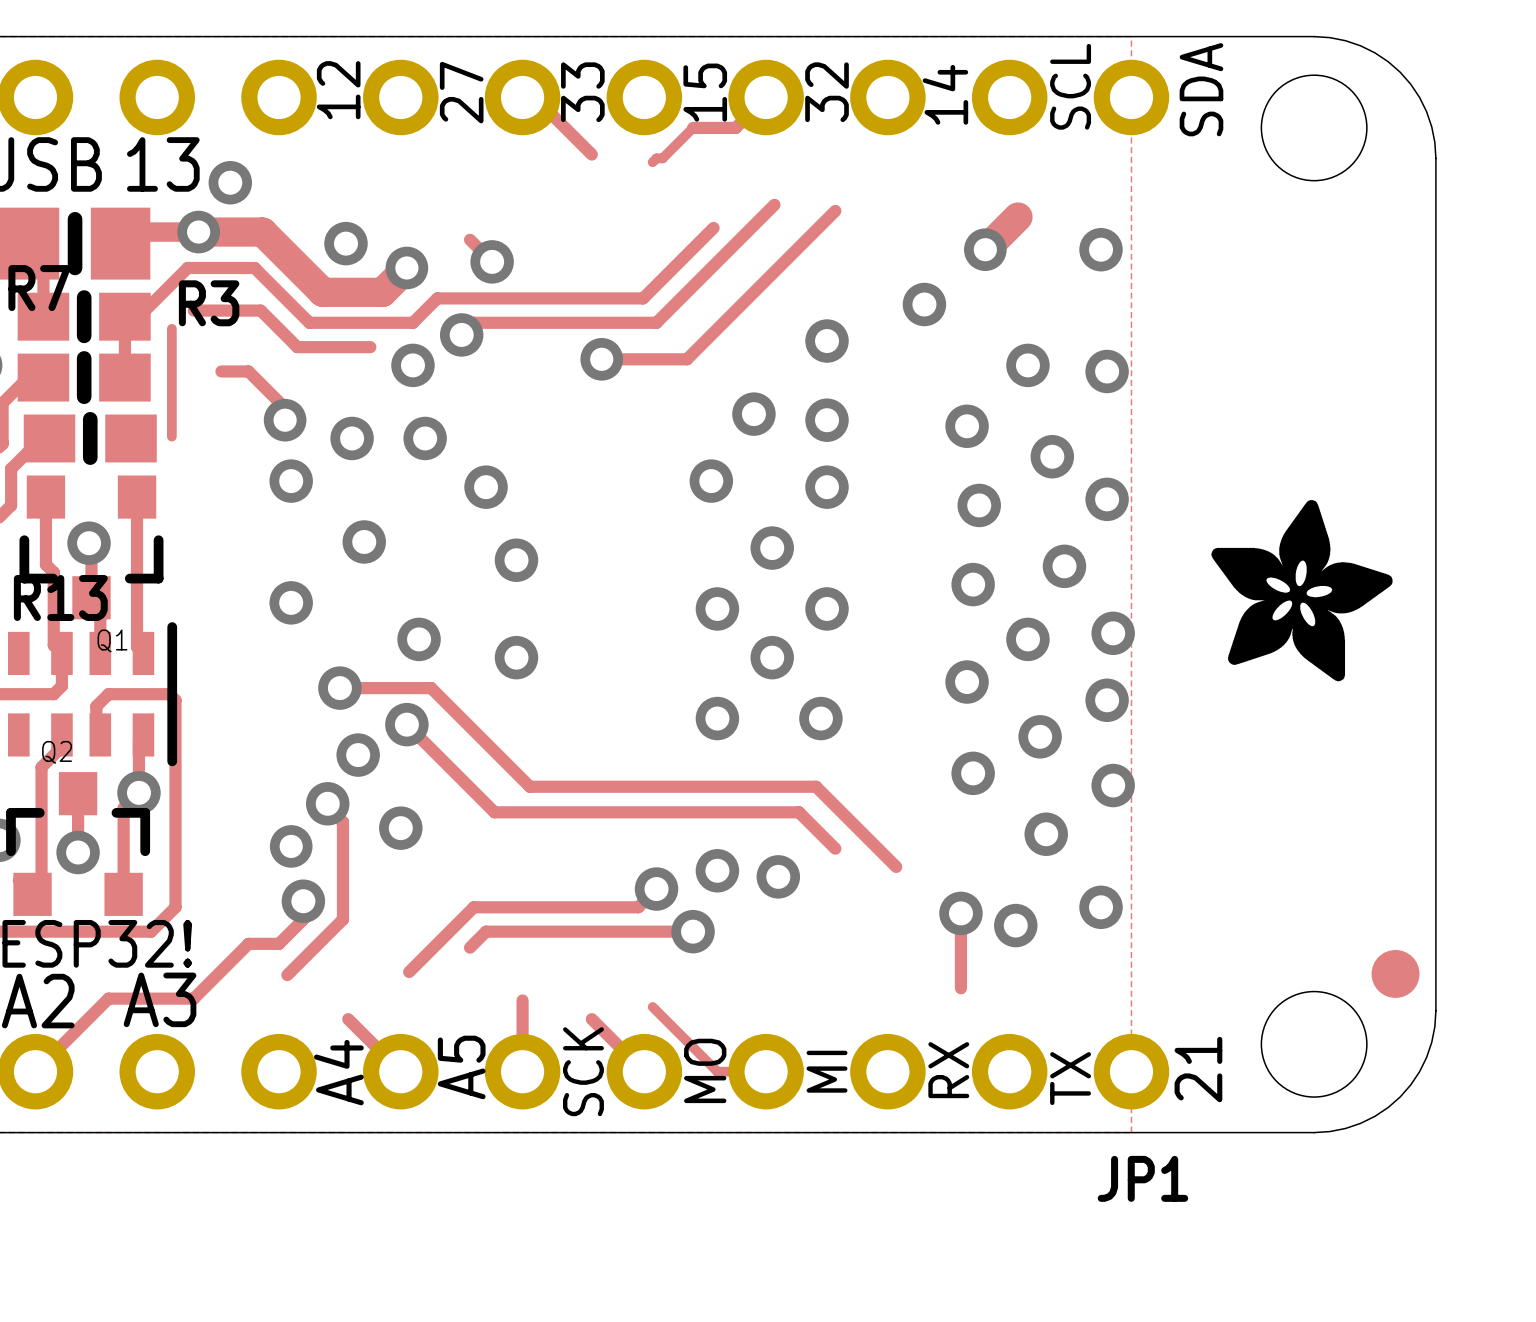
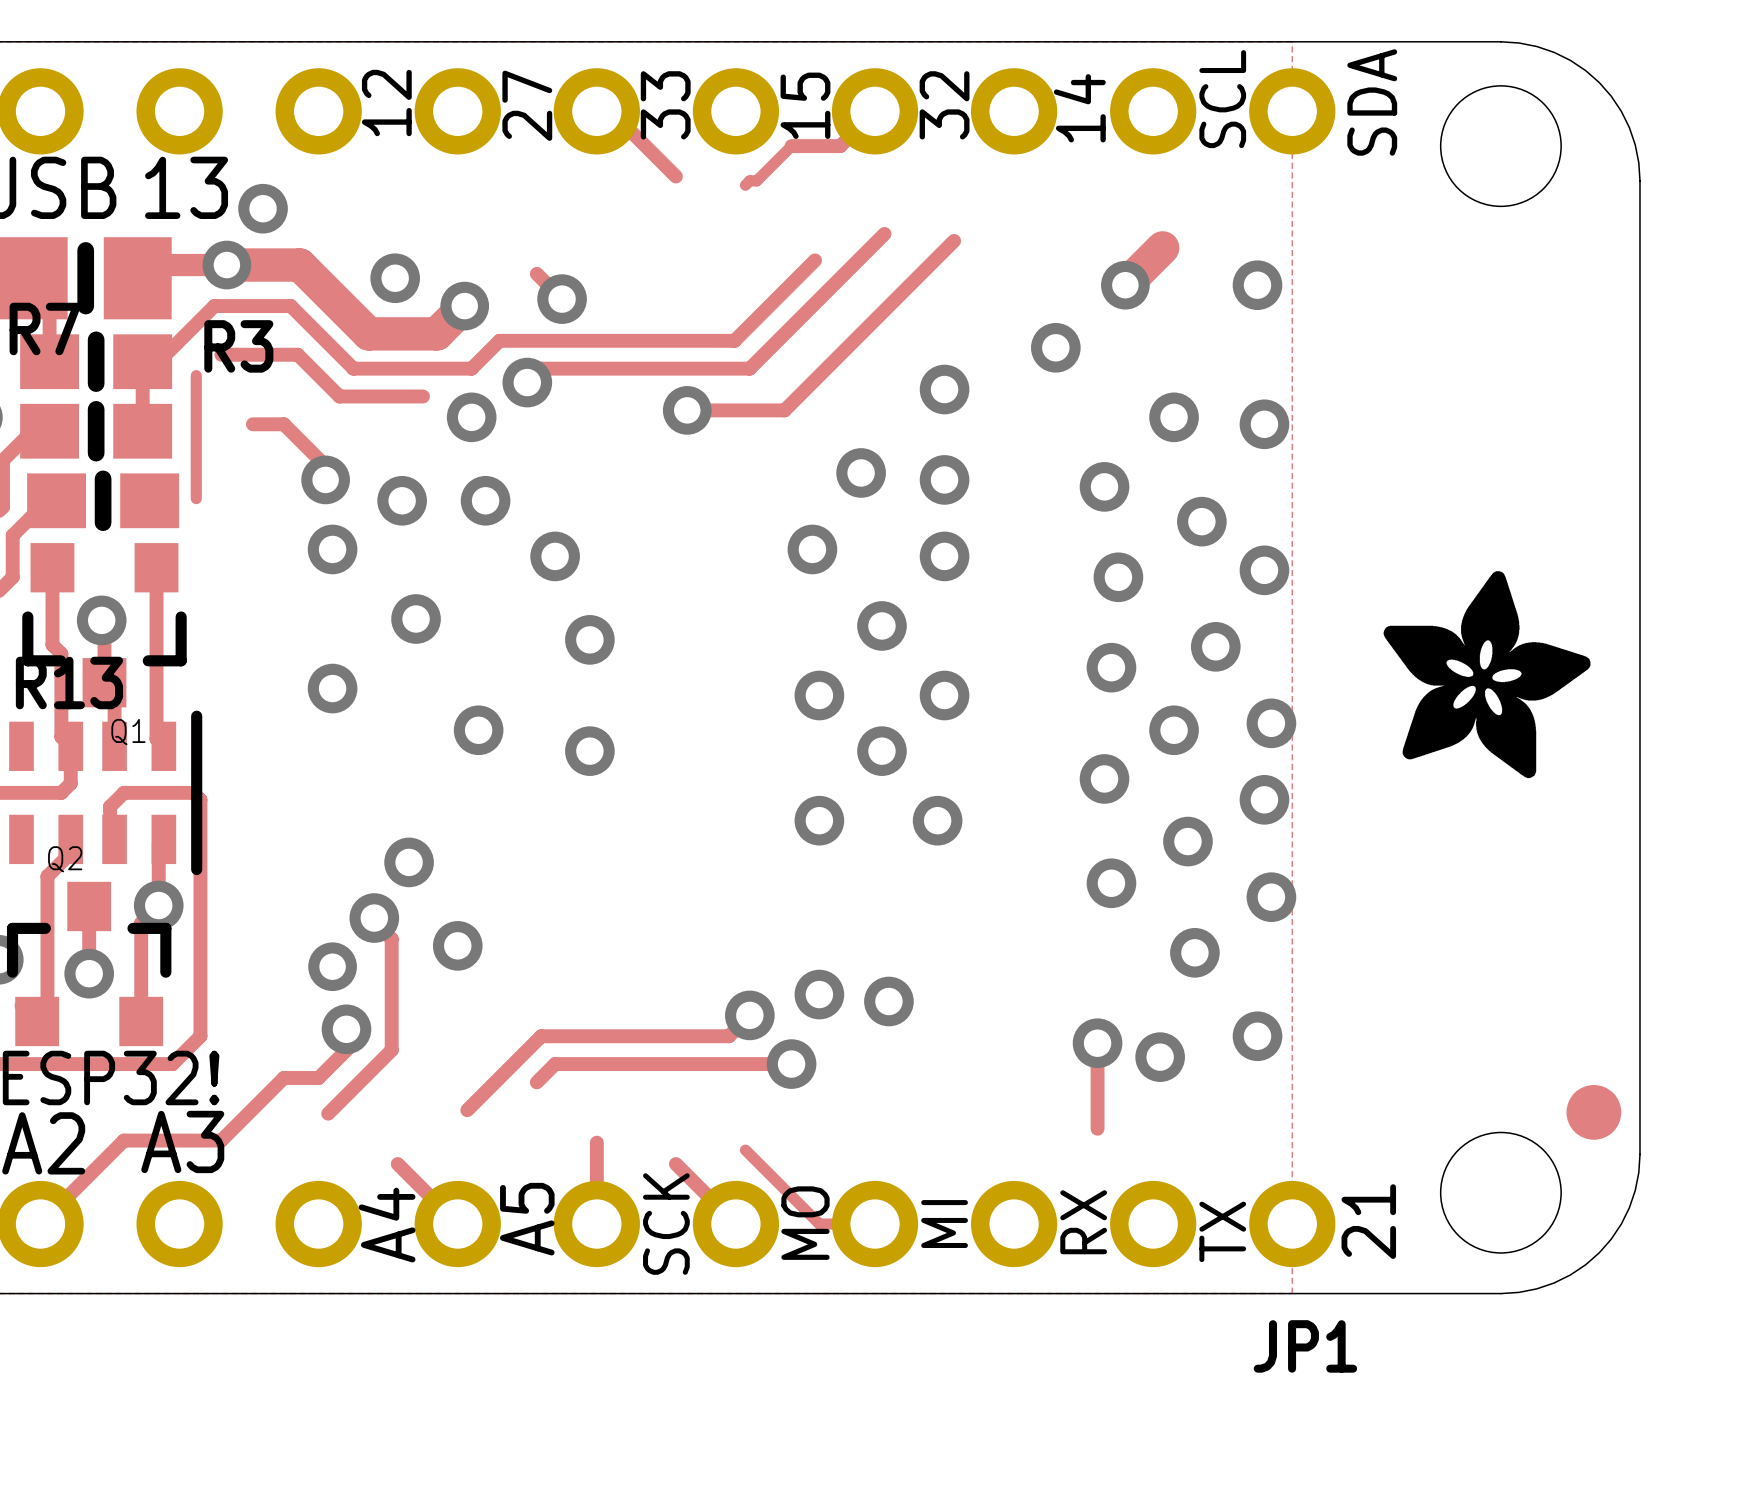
track: (339, 688) (431, 688) (529, 786) (816, 786) (896, 866) -> none
via: (339, 688) -> none
via: (406, 724) -> none
track: (412, 724) (406, 724) (494, 812) (799, 812) (835, 848) -> none

